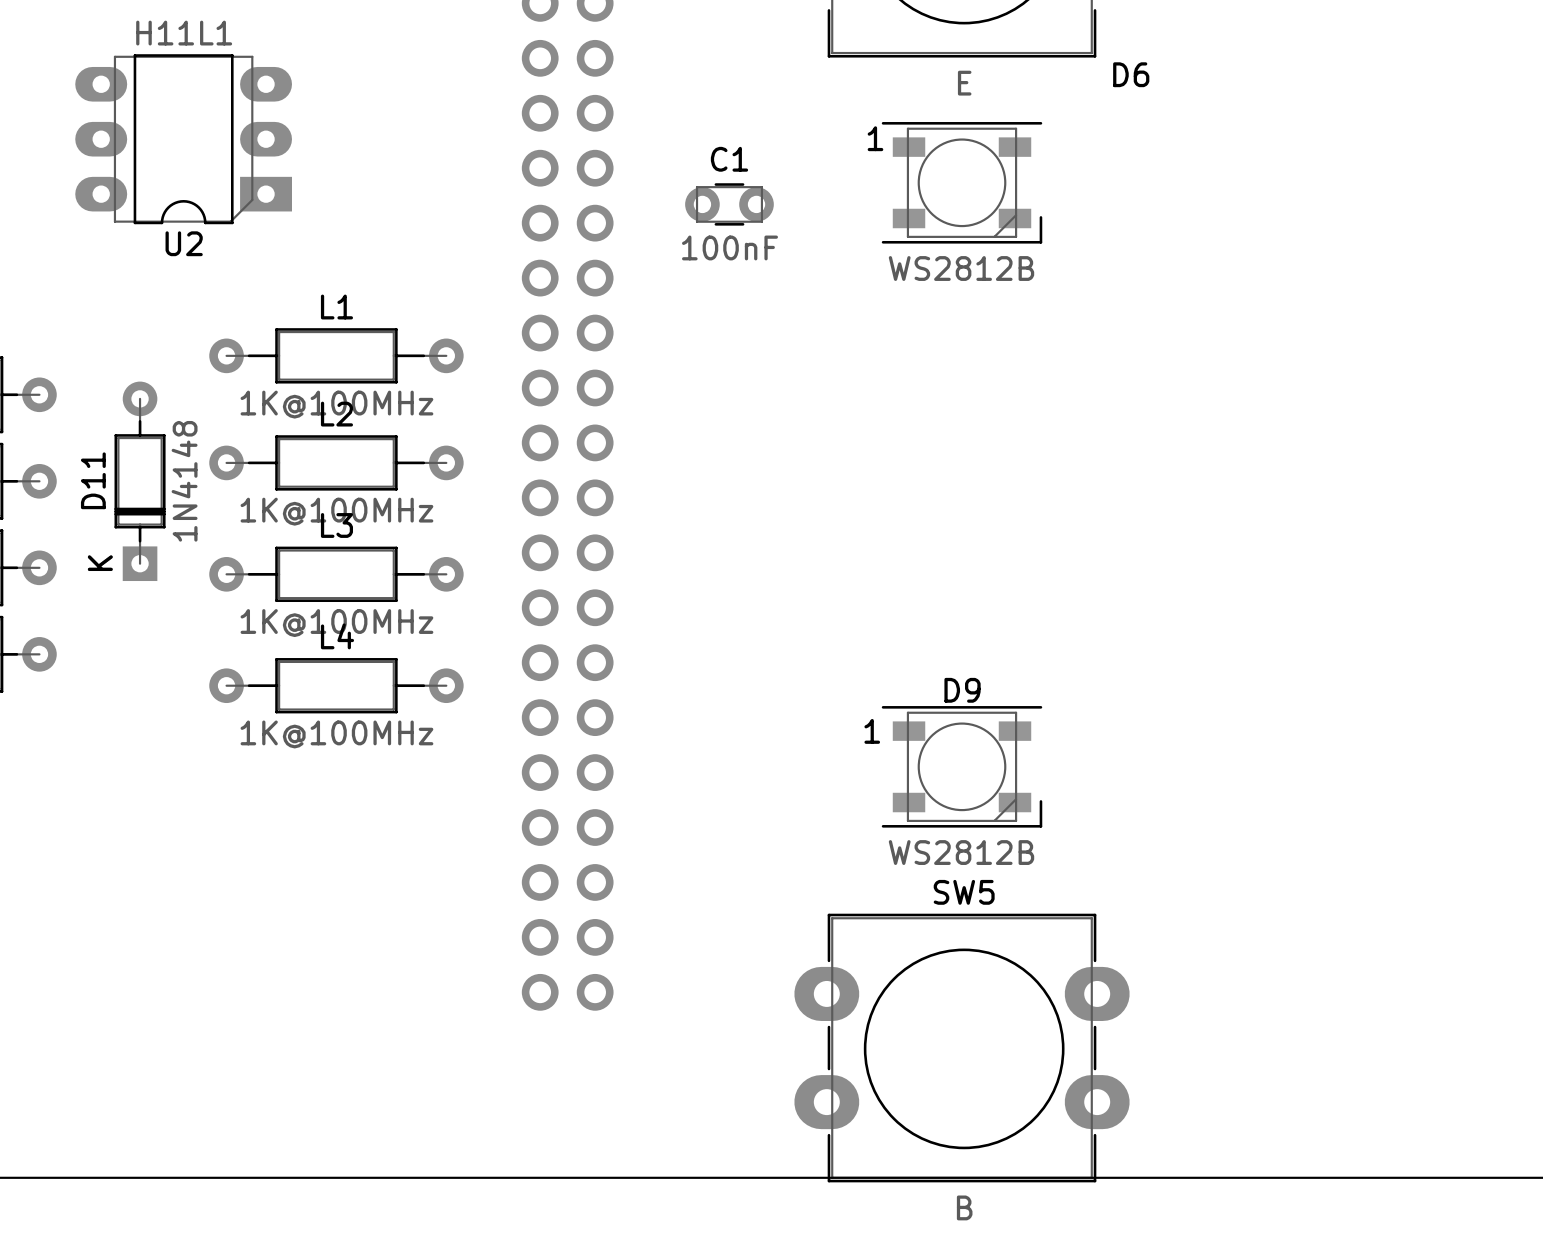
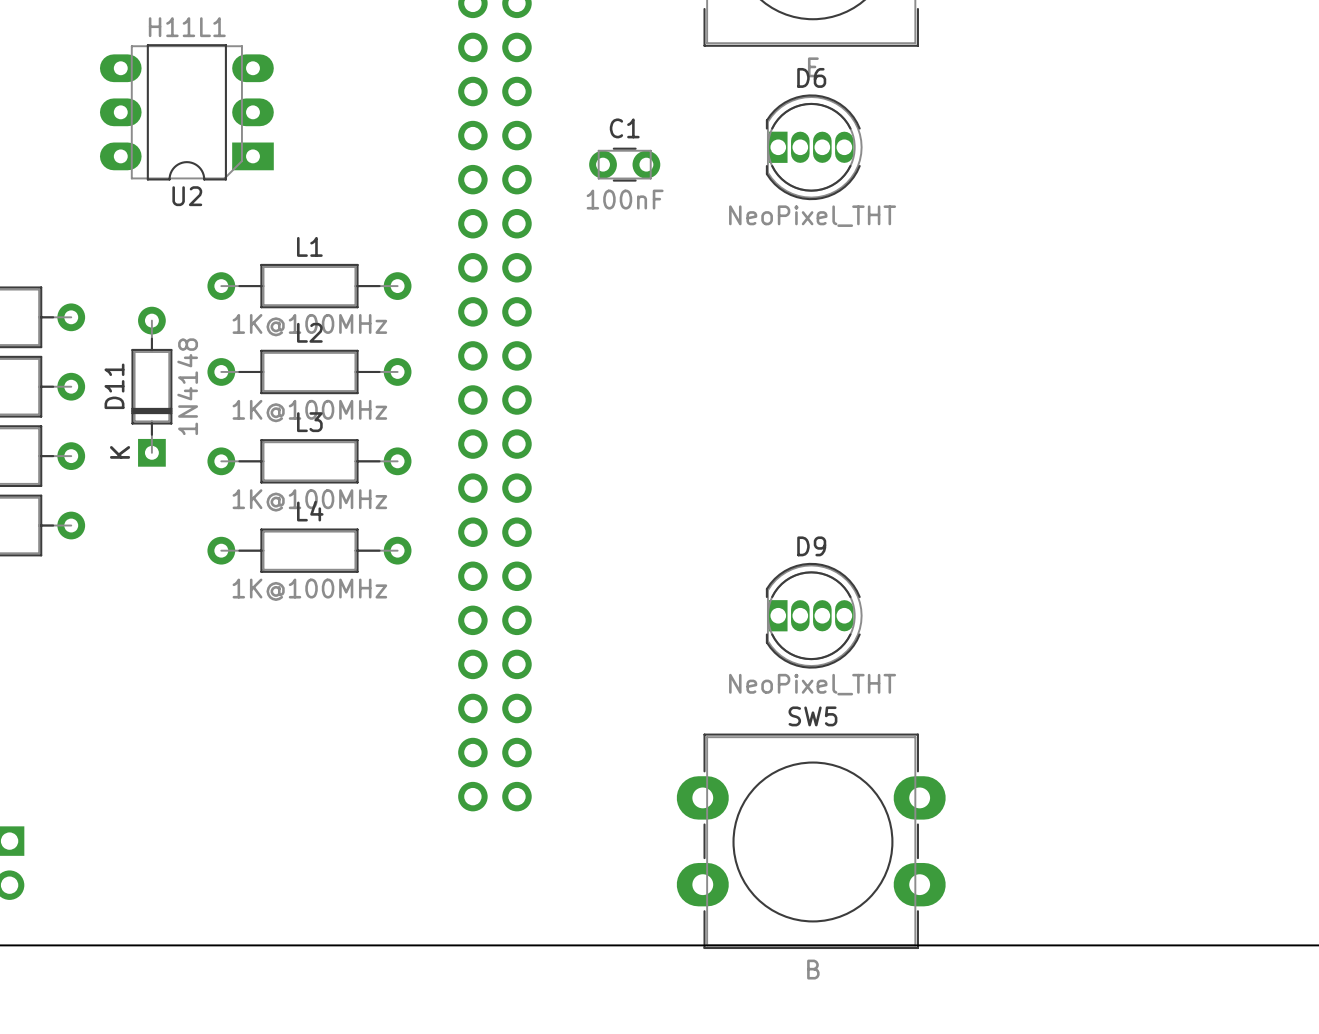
D6 name position: D6 (1131, 74) -> D6 (811, 77)
D6 footprint: [881, 122, 1043, 244] -> [765, 94, 863, 201]
D6 value: WS2812B (961, 268) -> NeoPixel_THT (812, 216)
D9 footprint: [881, 706, 1043, 828] -> [765, 562, 863, 669]
D9 value: WS2812B (961, 852) -> NeoPixel_THT (812, 684)

